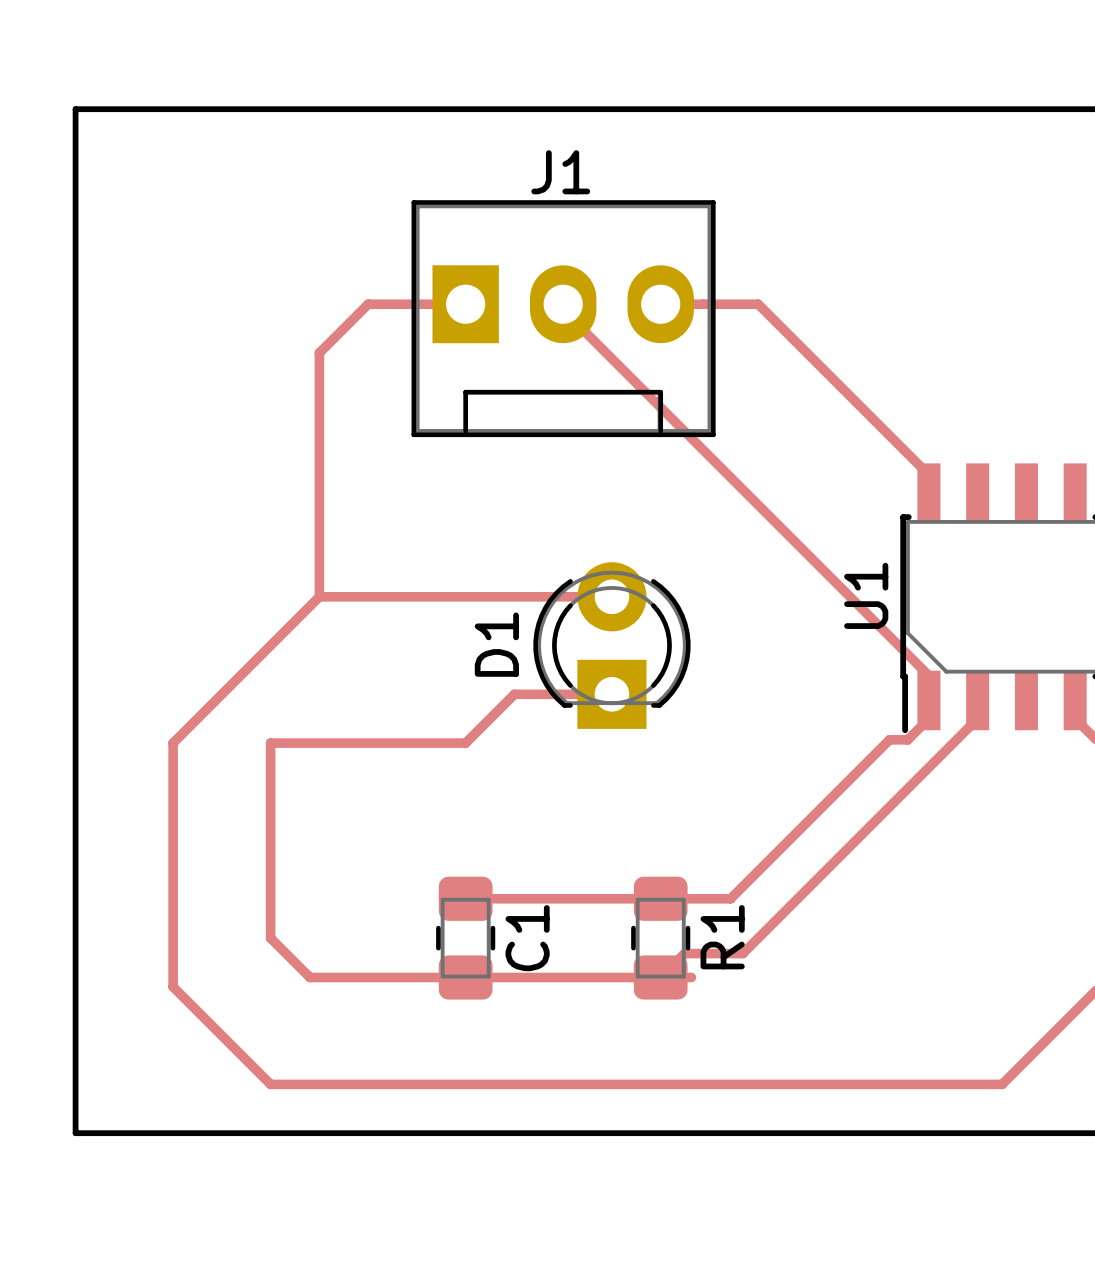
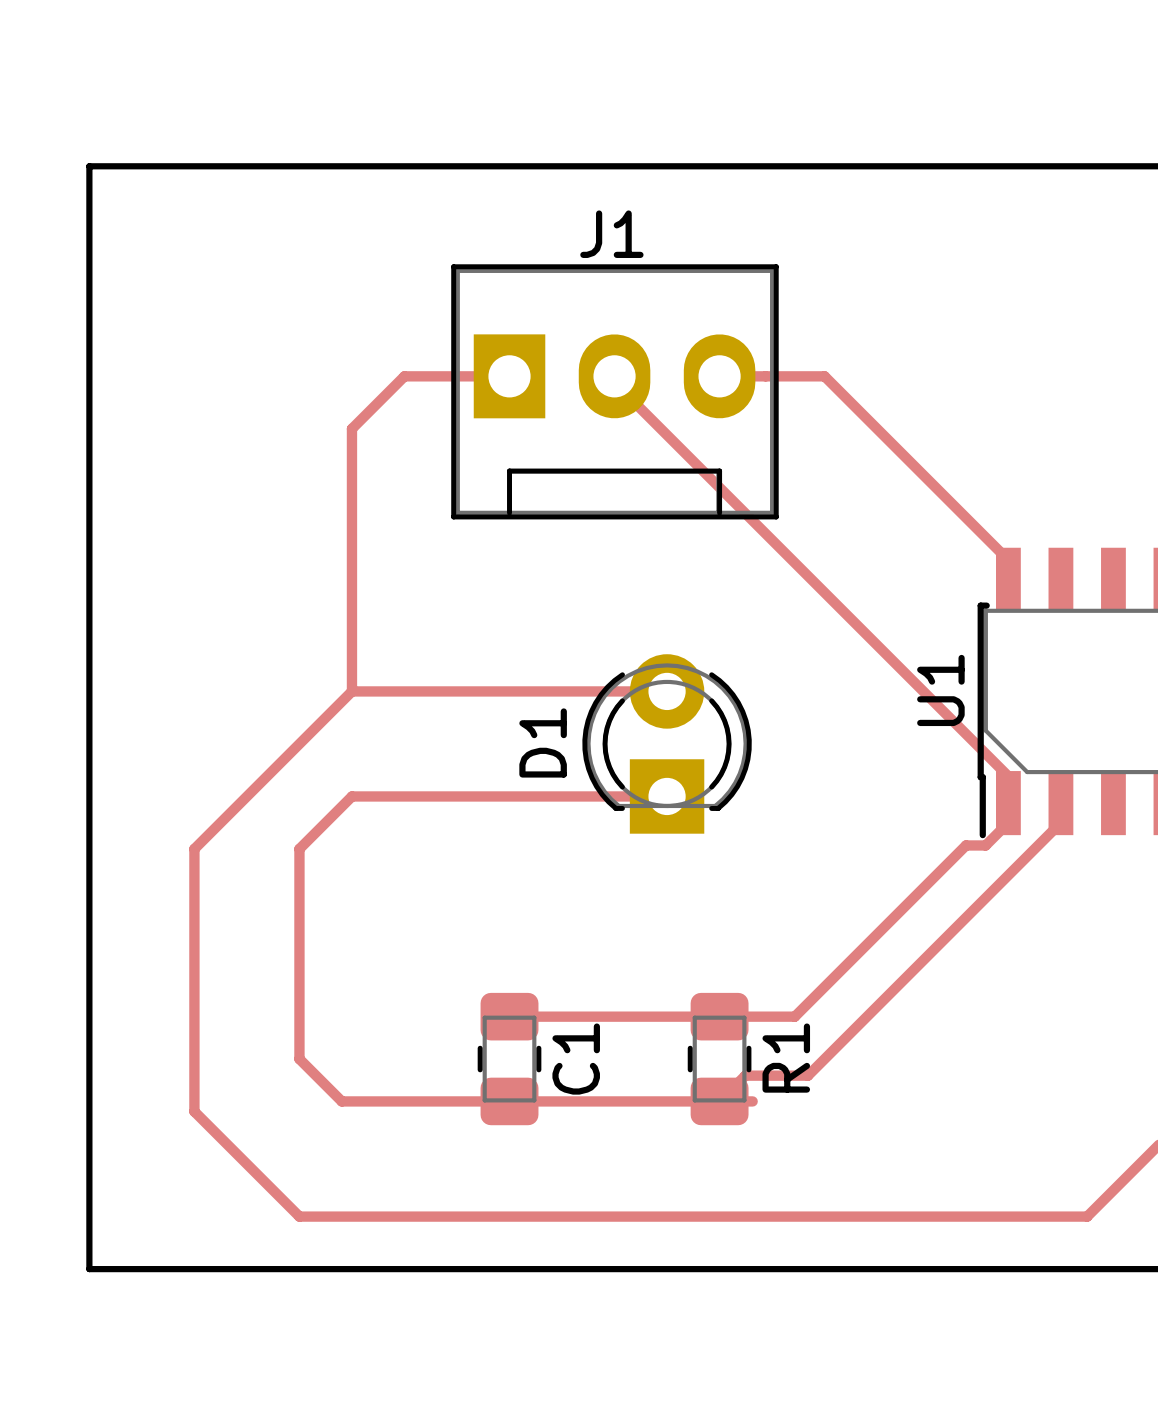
top track: (514, 694) (465, 743) (270, 743) -> (562, 796) (351, 796) (299, 848)

